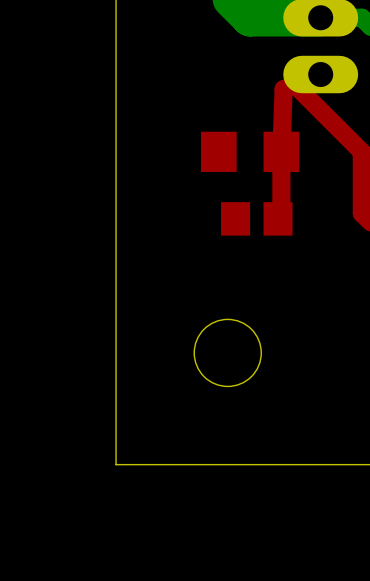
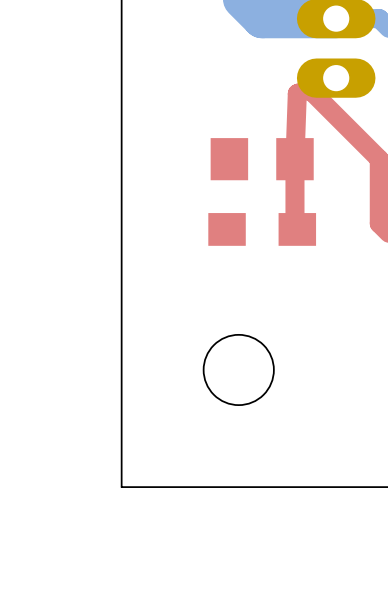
part footprint: [221, 202, 293, 236] -> [208, 213, 317, 246]

